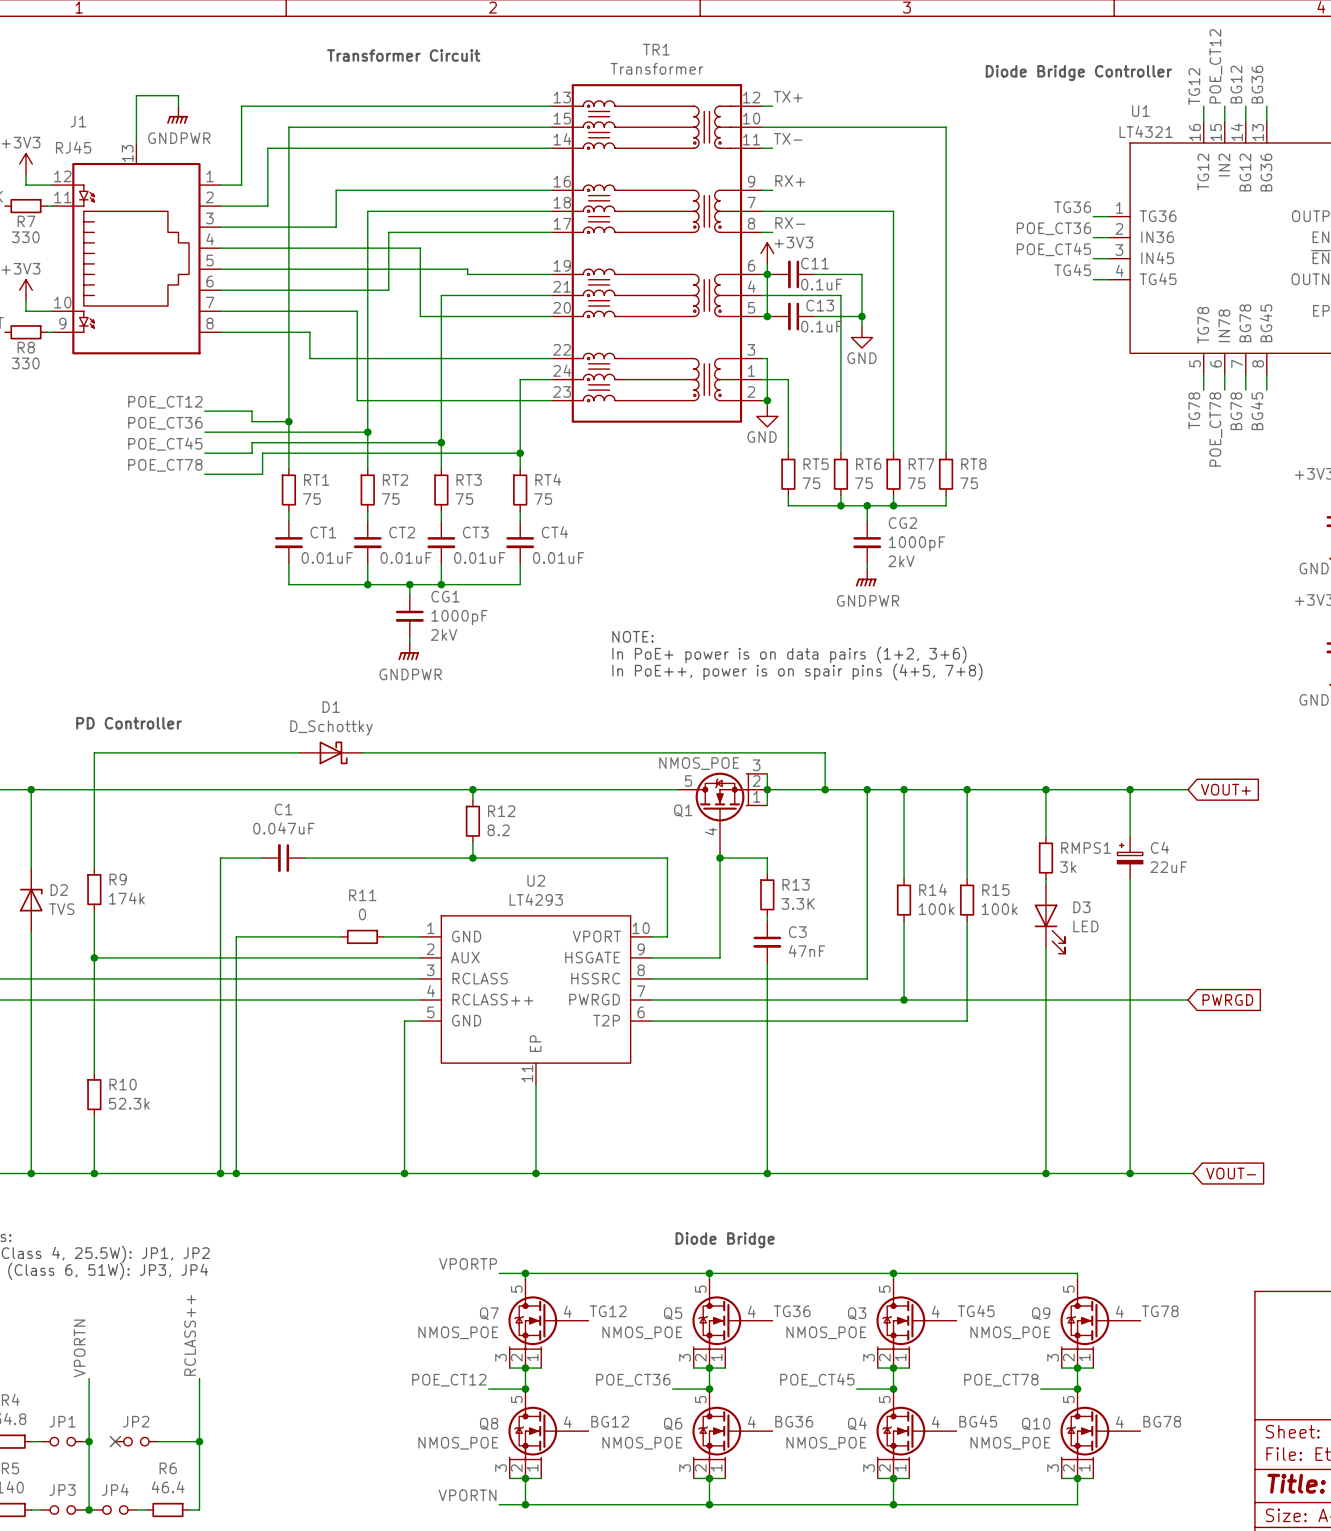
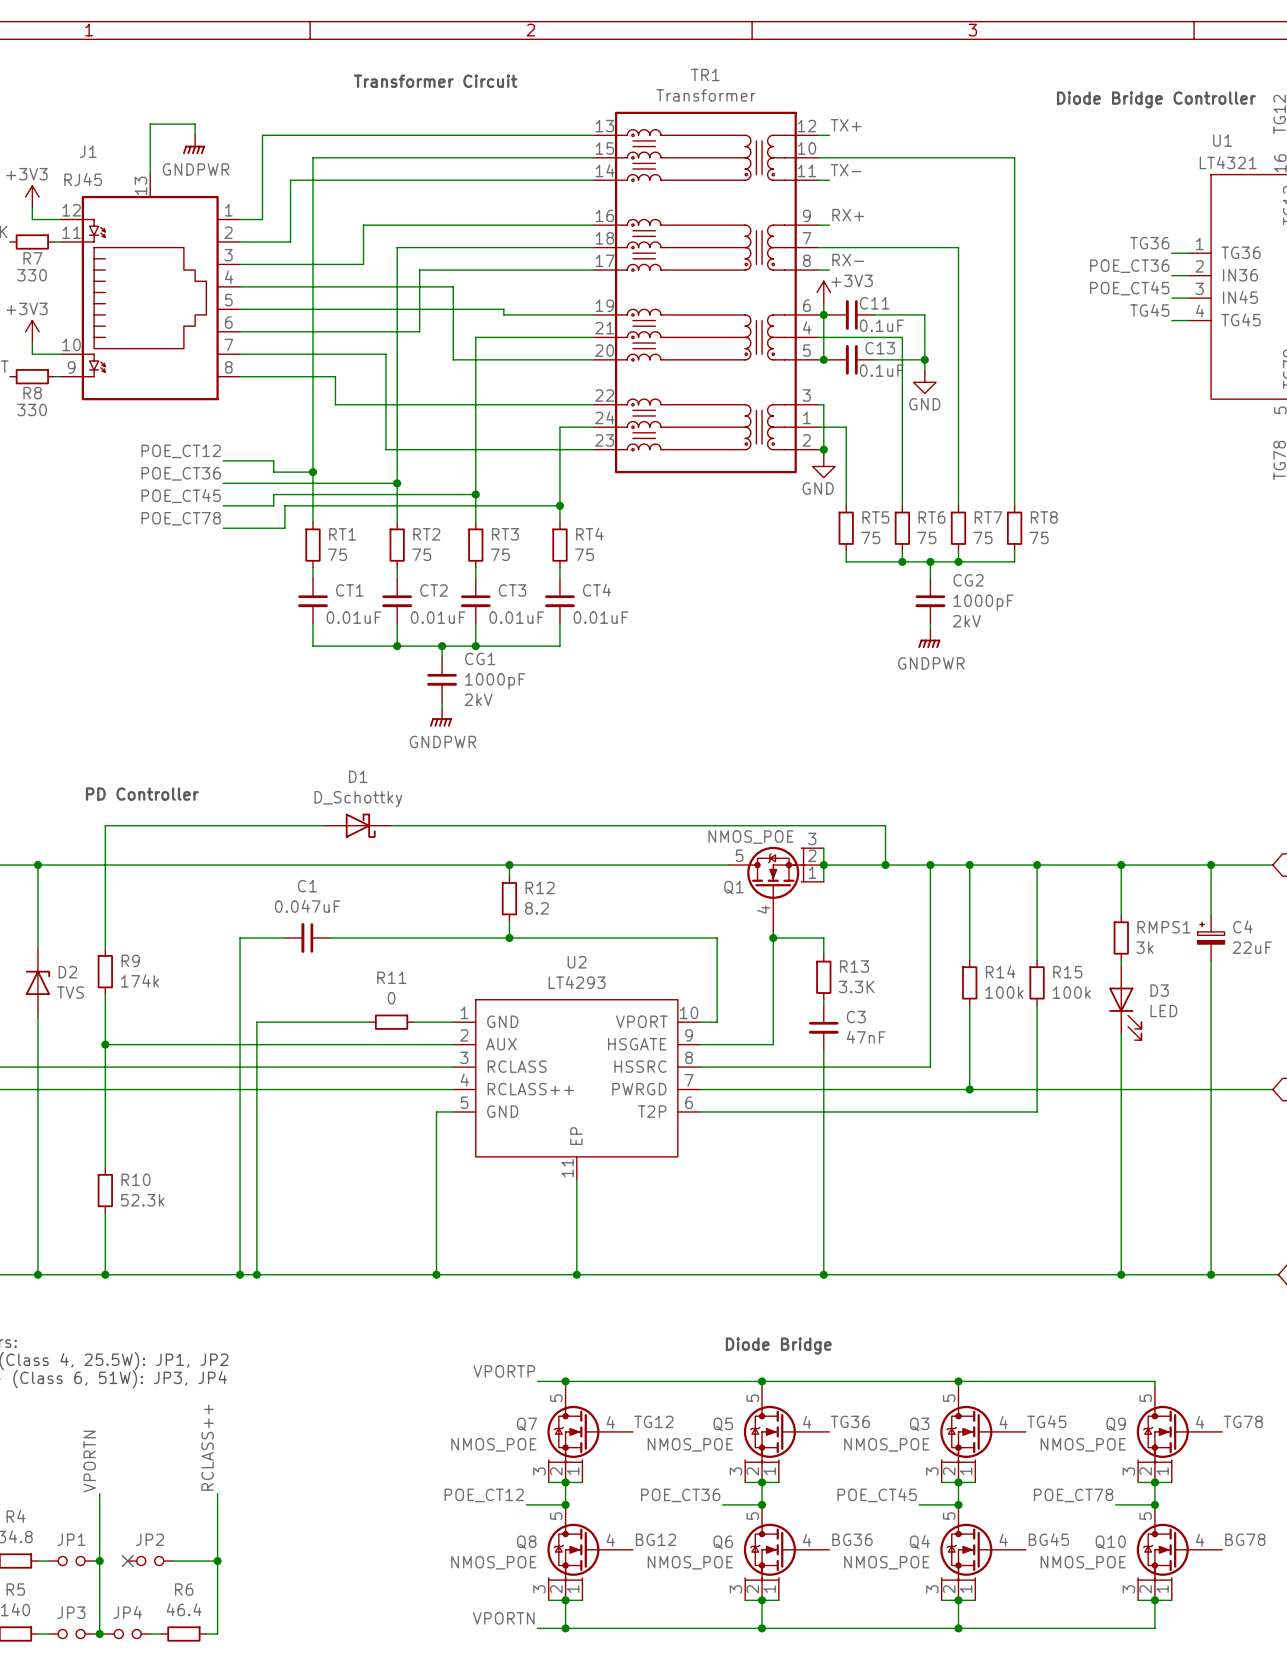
text: NOTE: (632, 636) -> none
text: In PoE+ power is on data pairs (1+2, 3+6) (789, 654) -> none
text: In PoE++, power is on spair pins (4+5, 7+8) (797, 671) -> none

